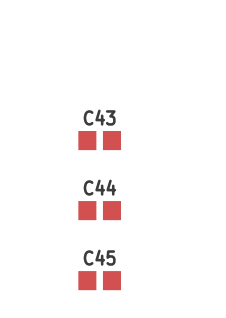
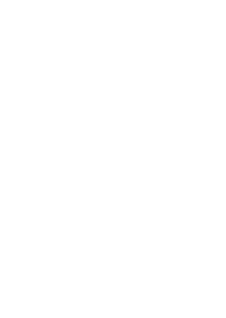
C43: (99, 140) -> none
C44: (99, 210) -> none
C45: (99, 280) -> none

